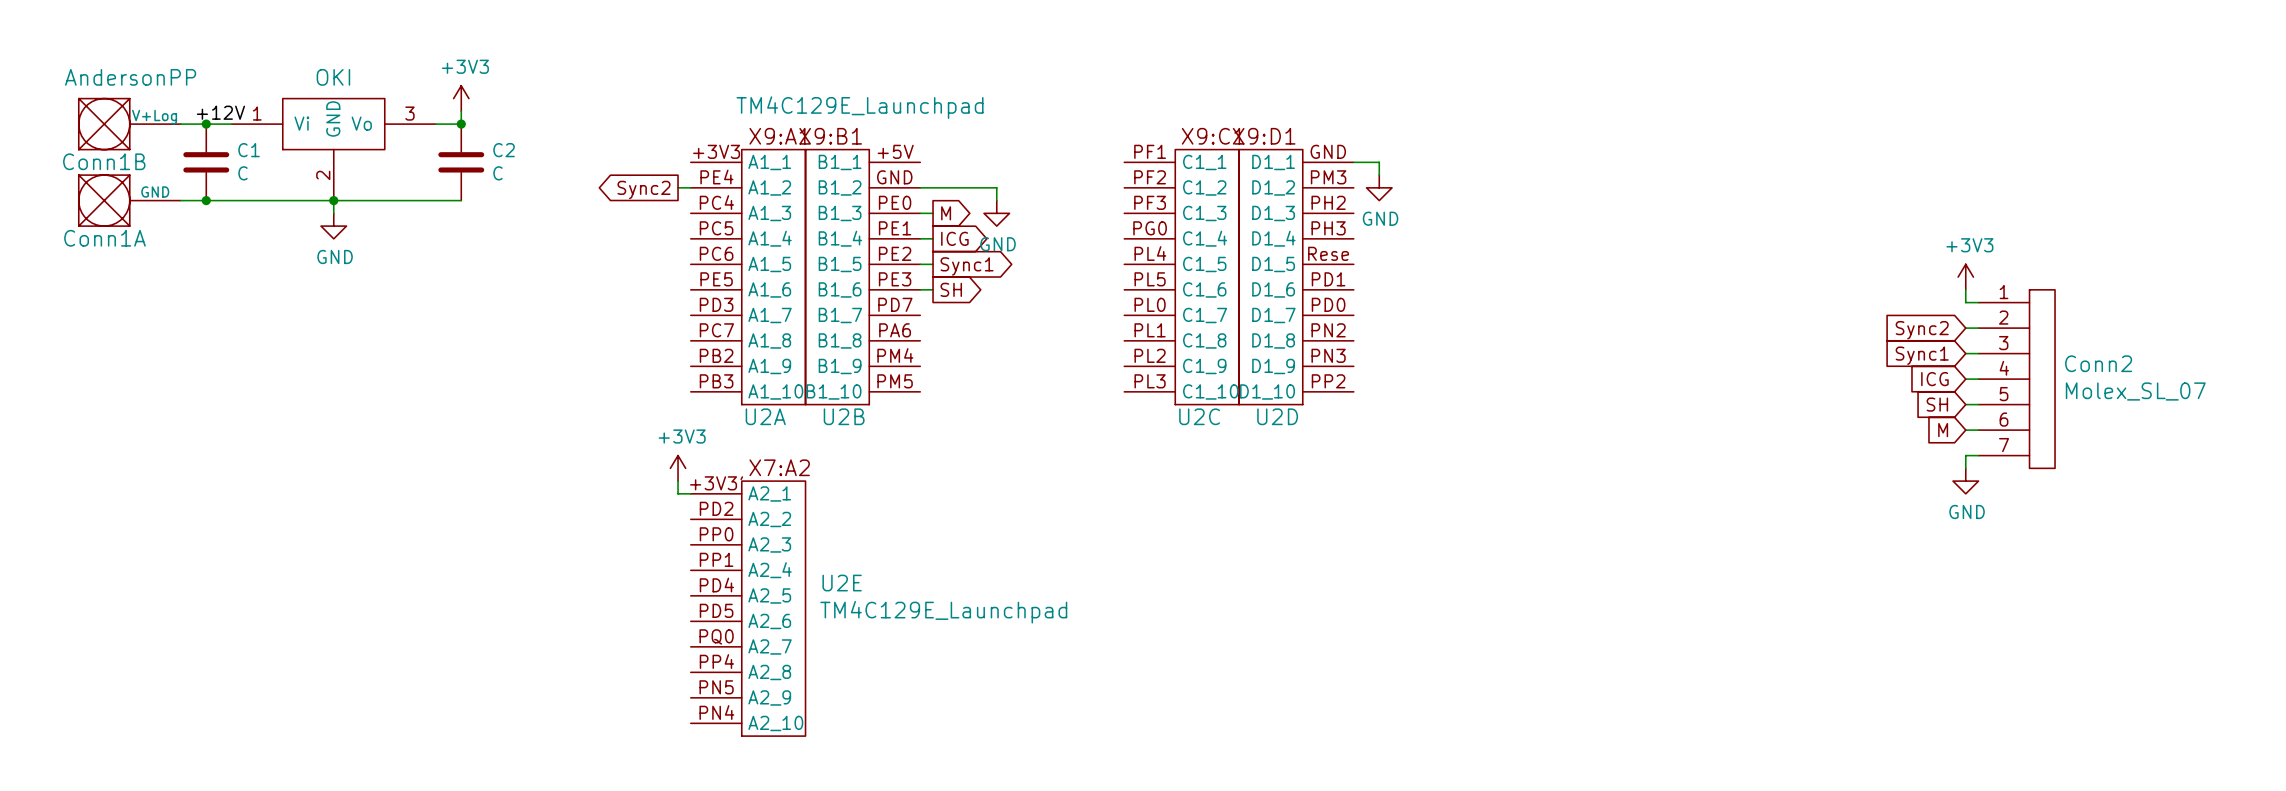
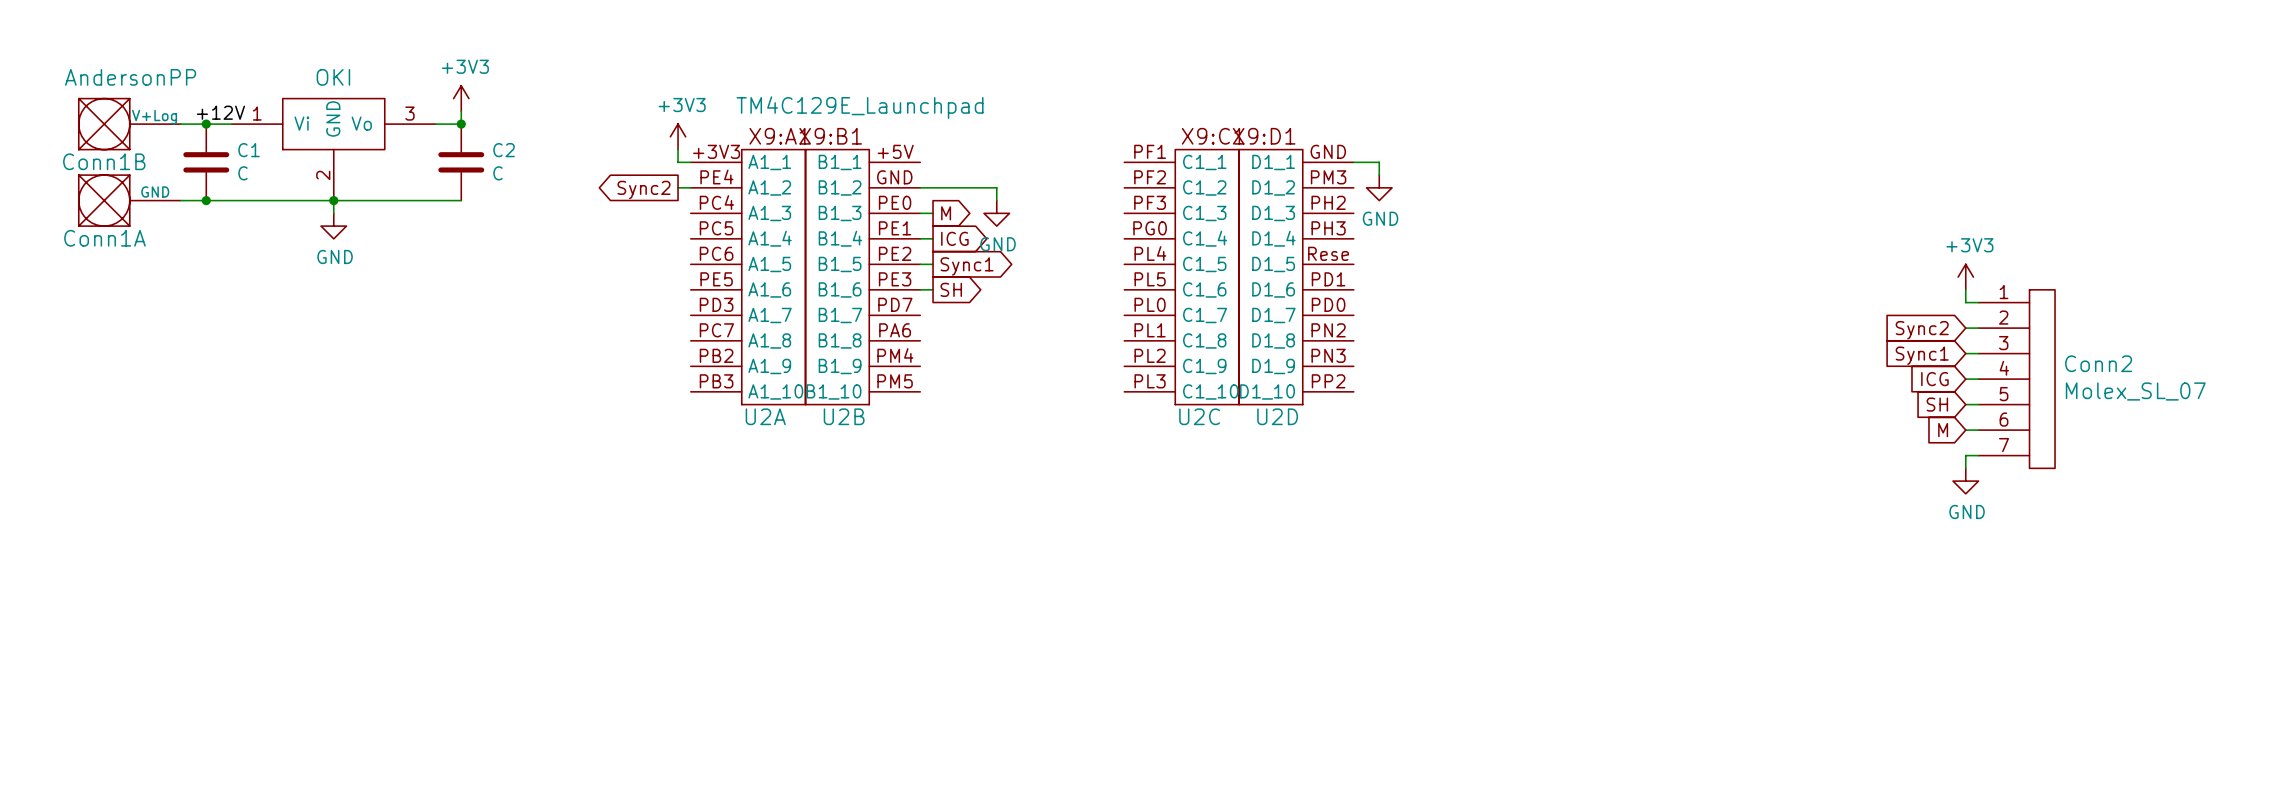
power symbol: none -> +3V3 (678, 136)
wire: none -> (678, 149) (678, 162) (690, 162)
power symbol: +3V3 (678, 468) -> none
wire: (678, 481) (678, 493) (690, 493) -> none
U2E: TM4C129E_Launchpad (748, 608) -> none

